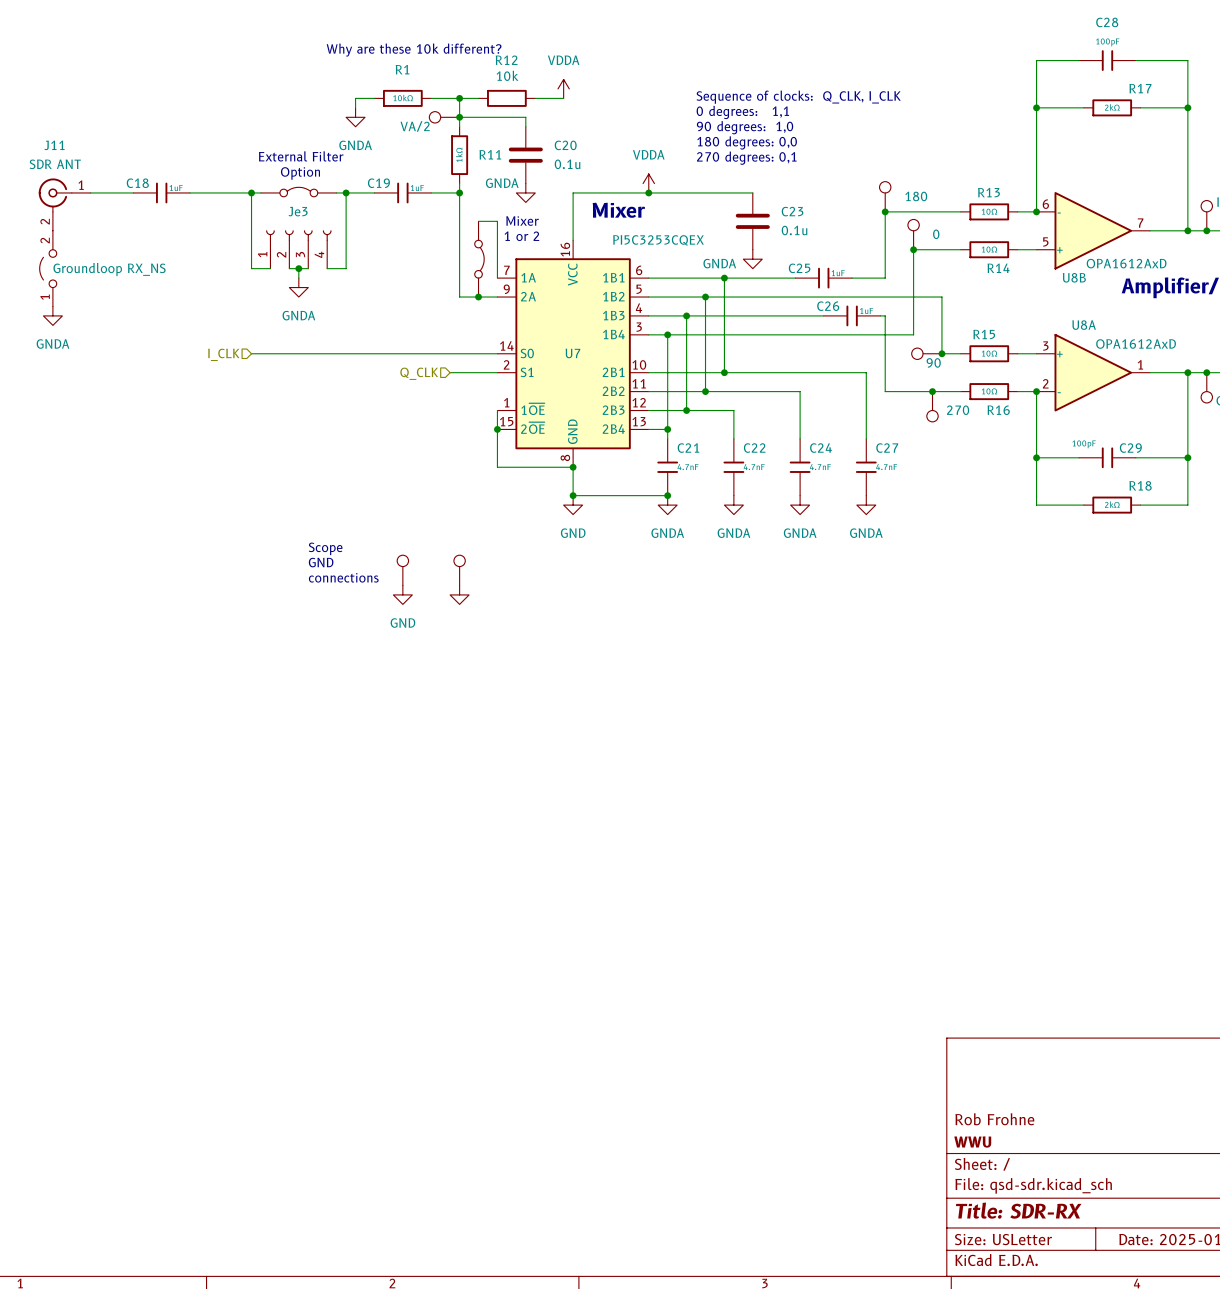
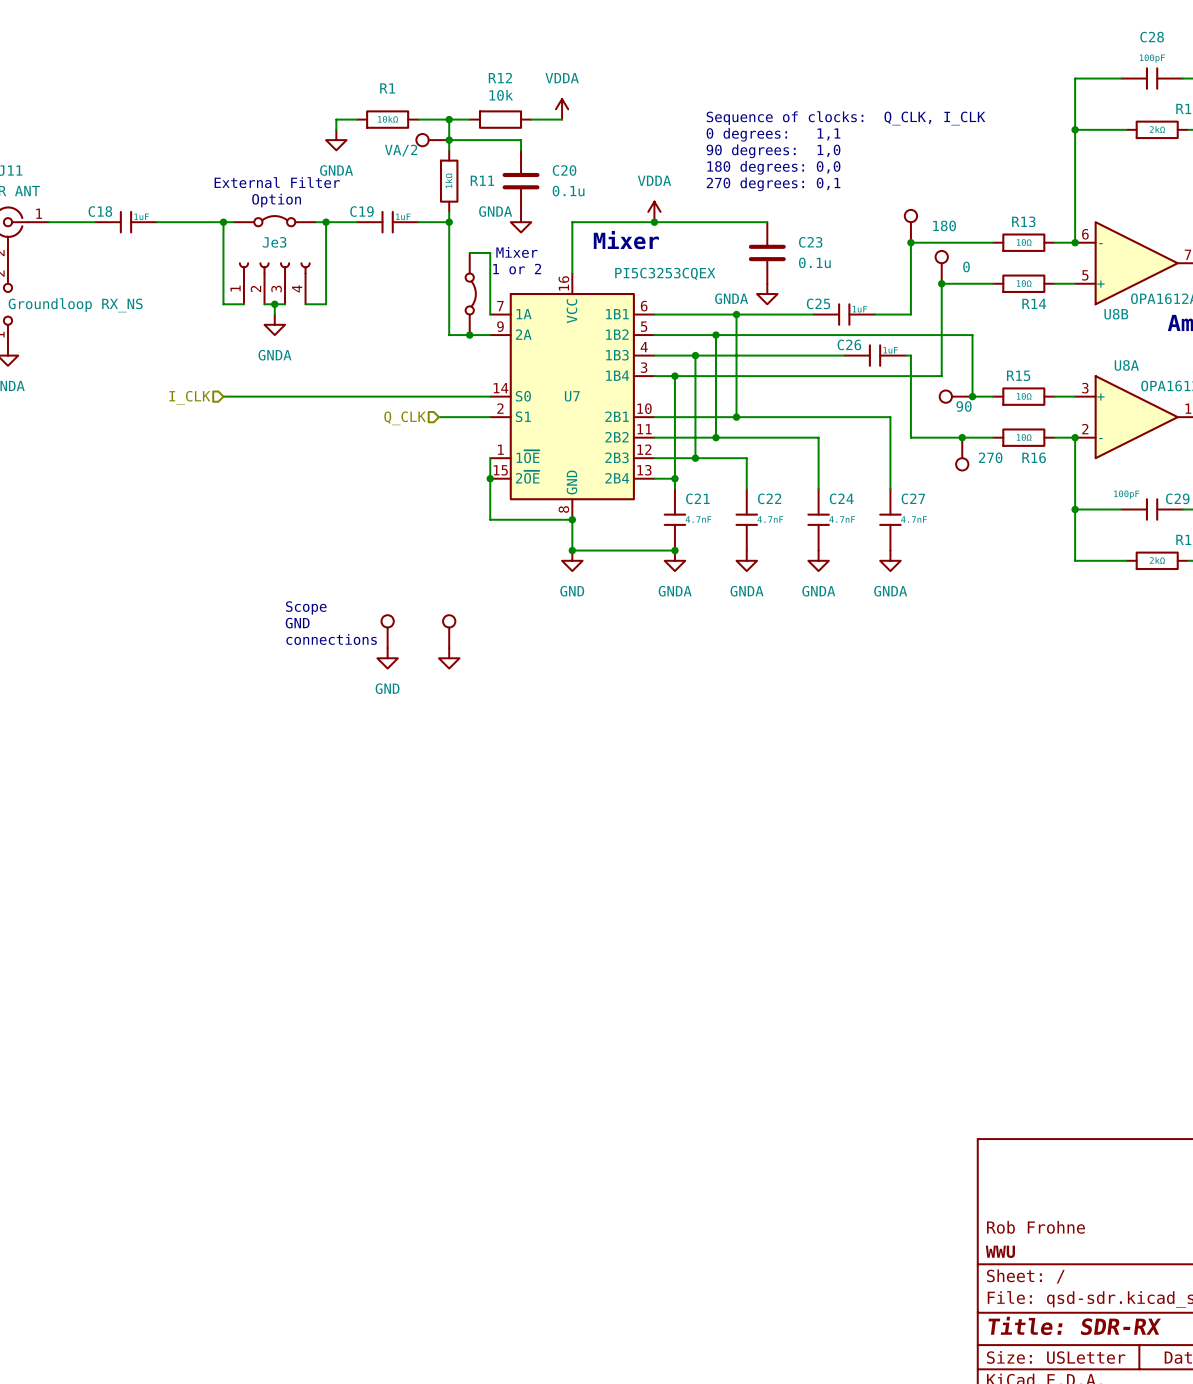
text: Why are these 10k different? (414, 50) -> none

